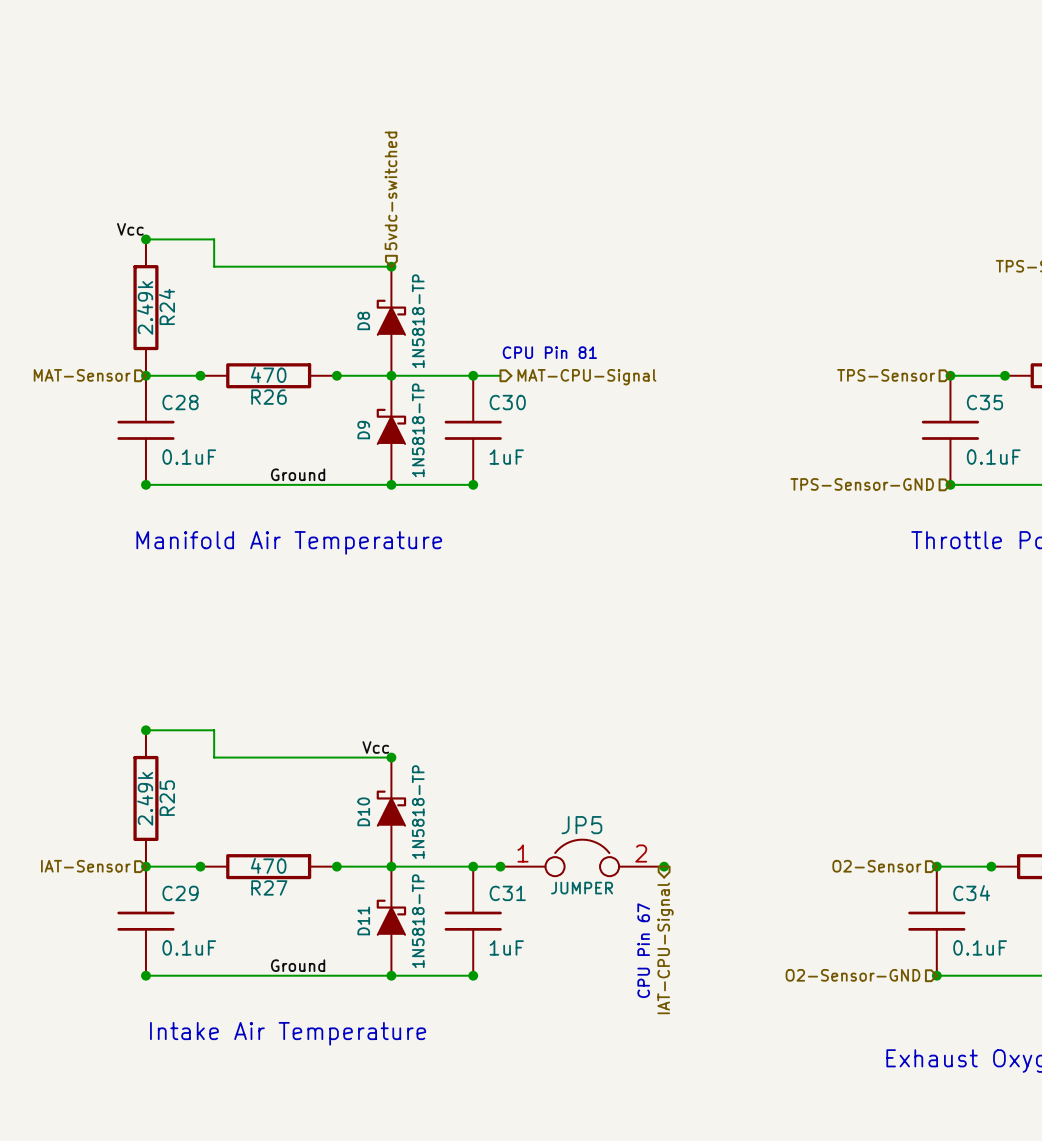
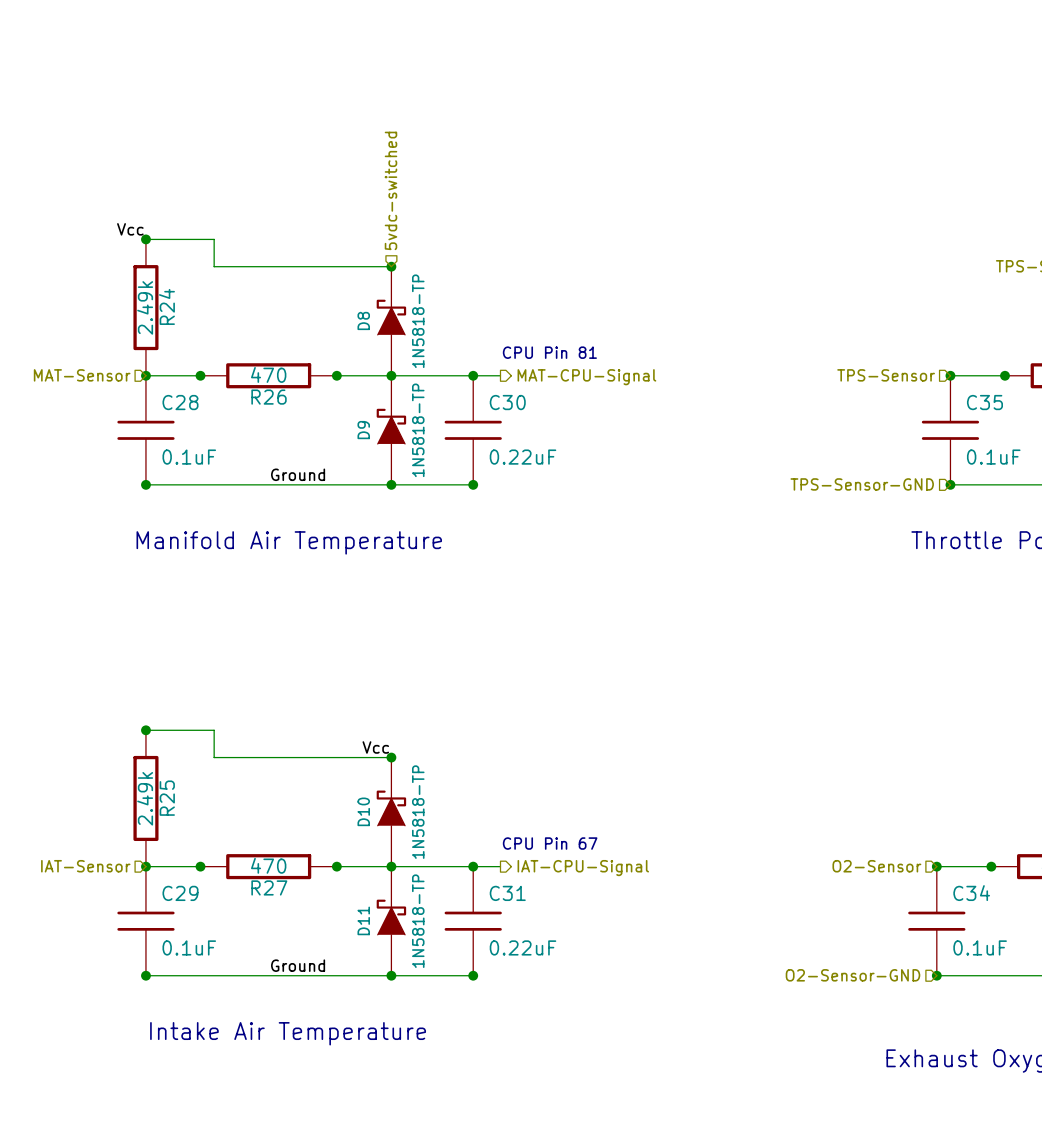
C30 value: 1uF (506, 457) -> 0.22uF (522, 457)
JP5: JUMPER (582, 857) -> none
junction: (500, 866) -> none
junction: (664, 866) -> none
C31 value: 1uF (506, 947) -> 0.22uF (522, 947)
hierarchical label rotation: 0° (665, 948) -> 90° counterclockwise (583, 868)
text rotation: 0° (643, 950) -> 90° clockwise (550, 843)
text position: CPU Pin 67 (643, 950) -> CPU Pin 67 (550, 843)

